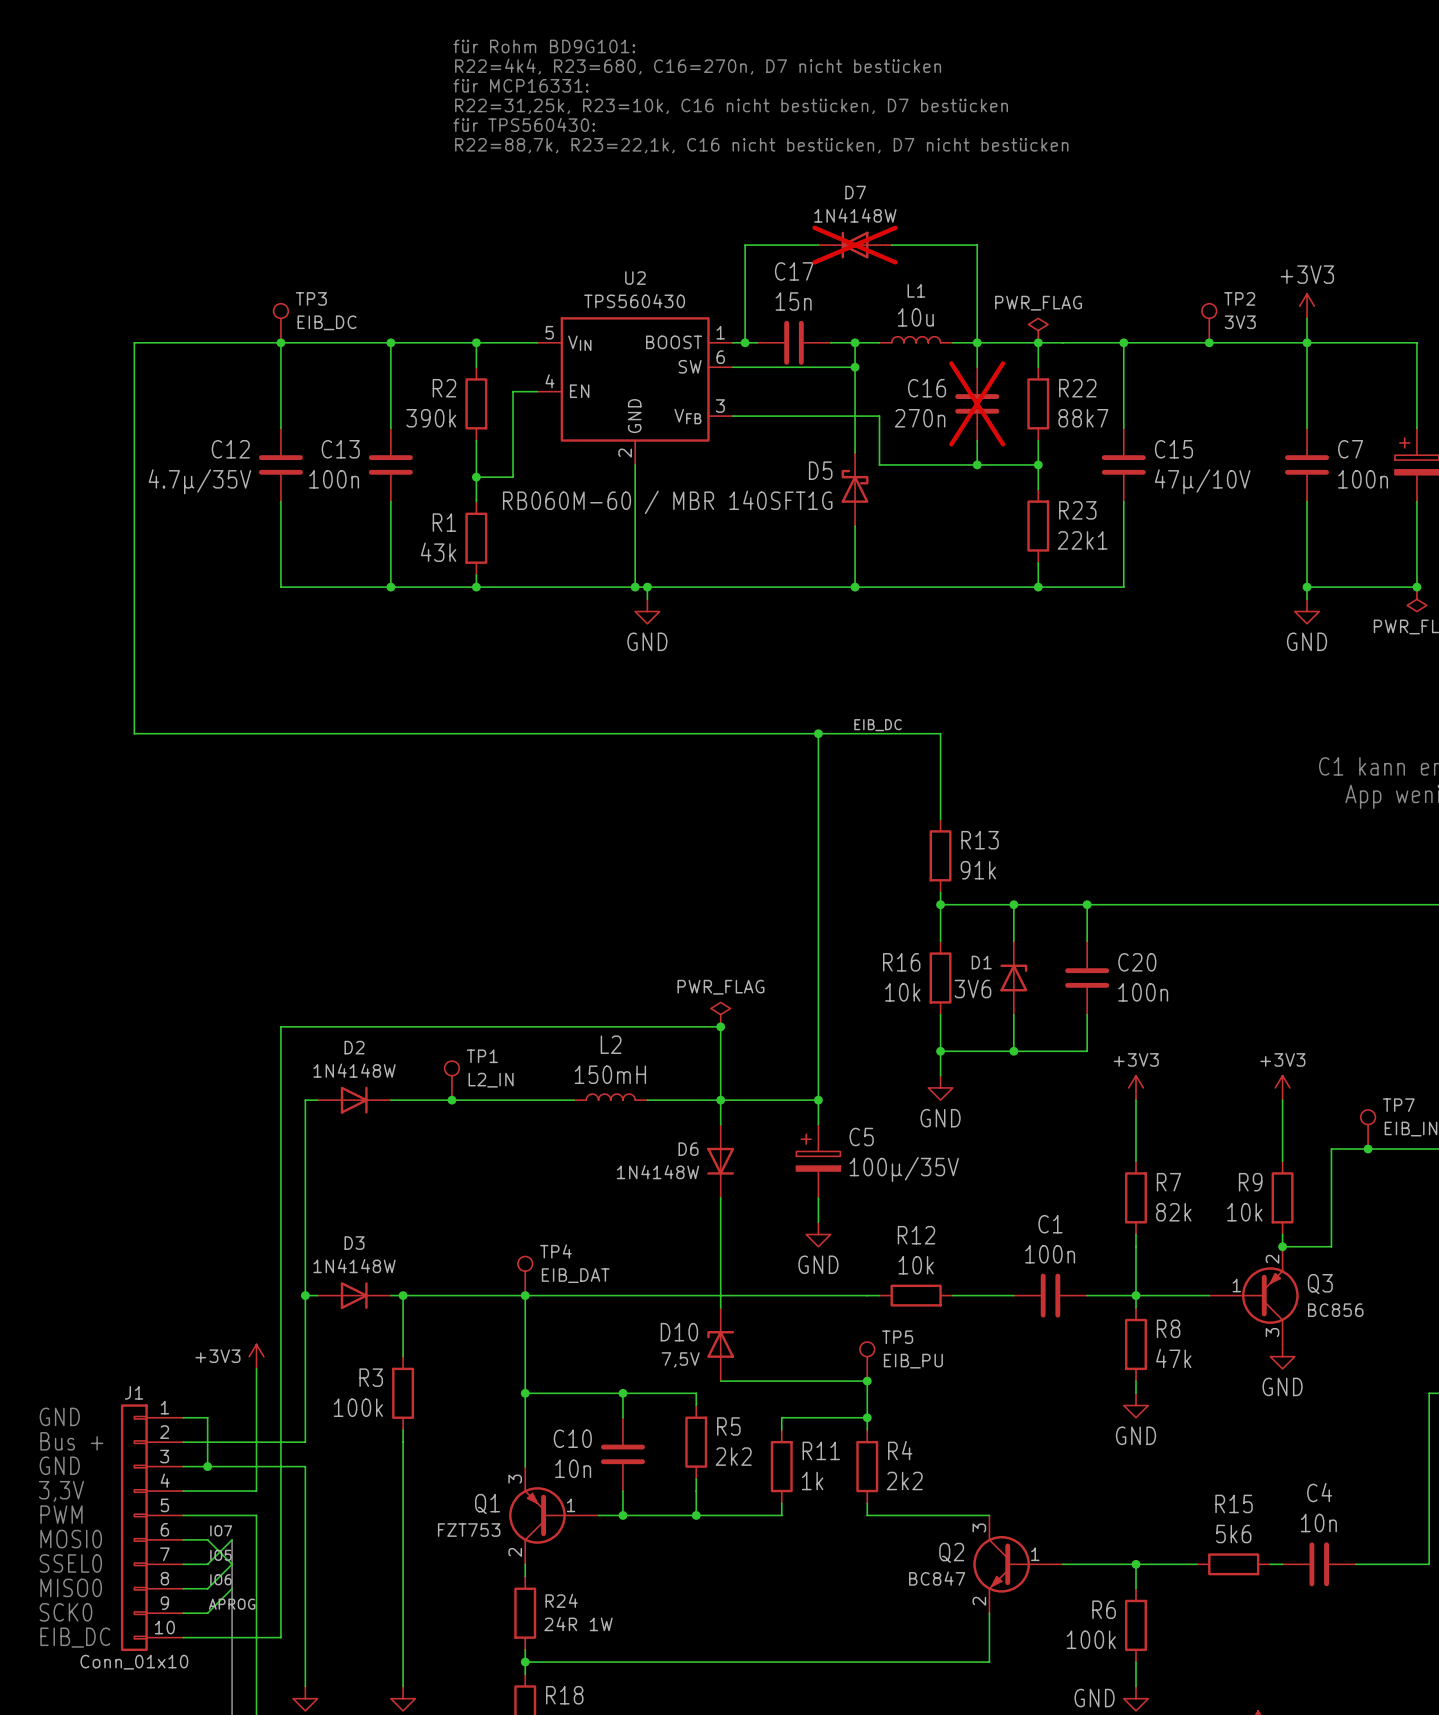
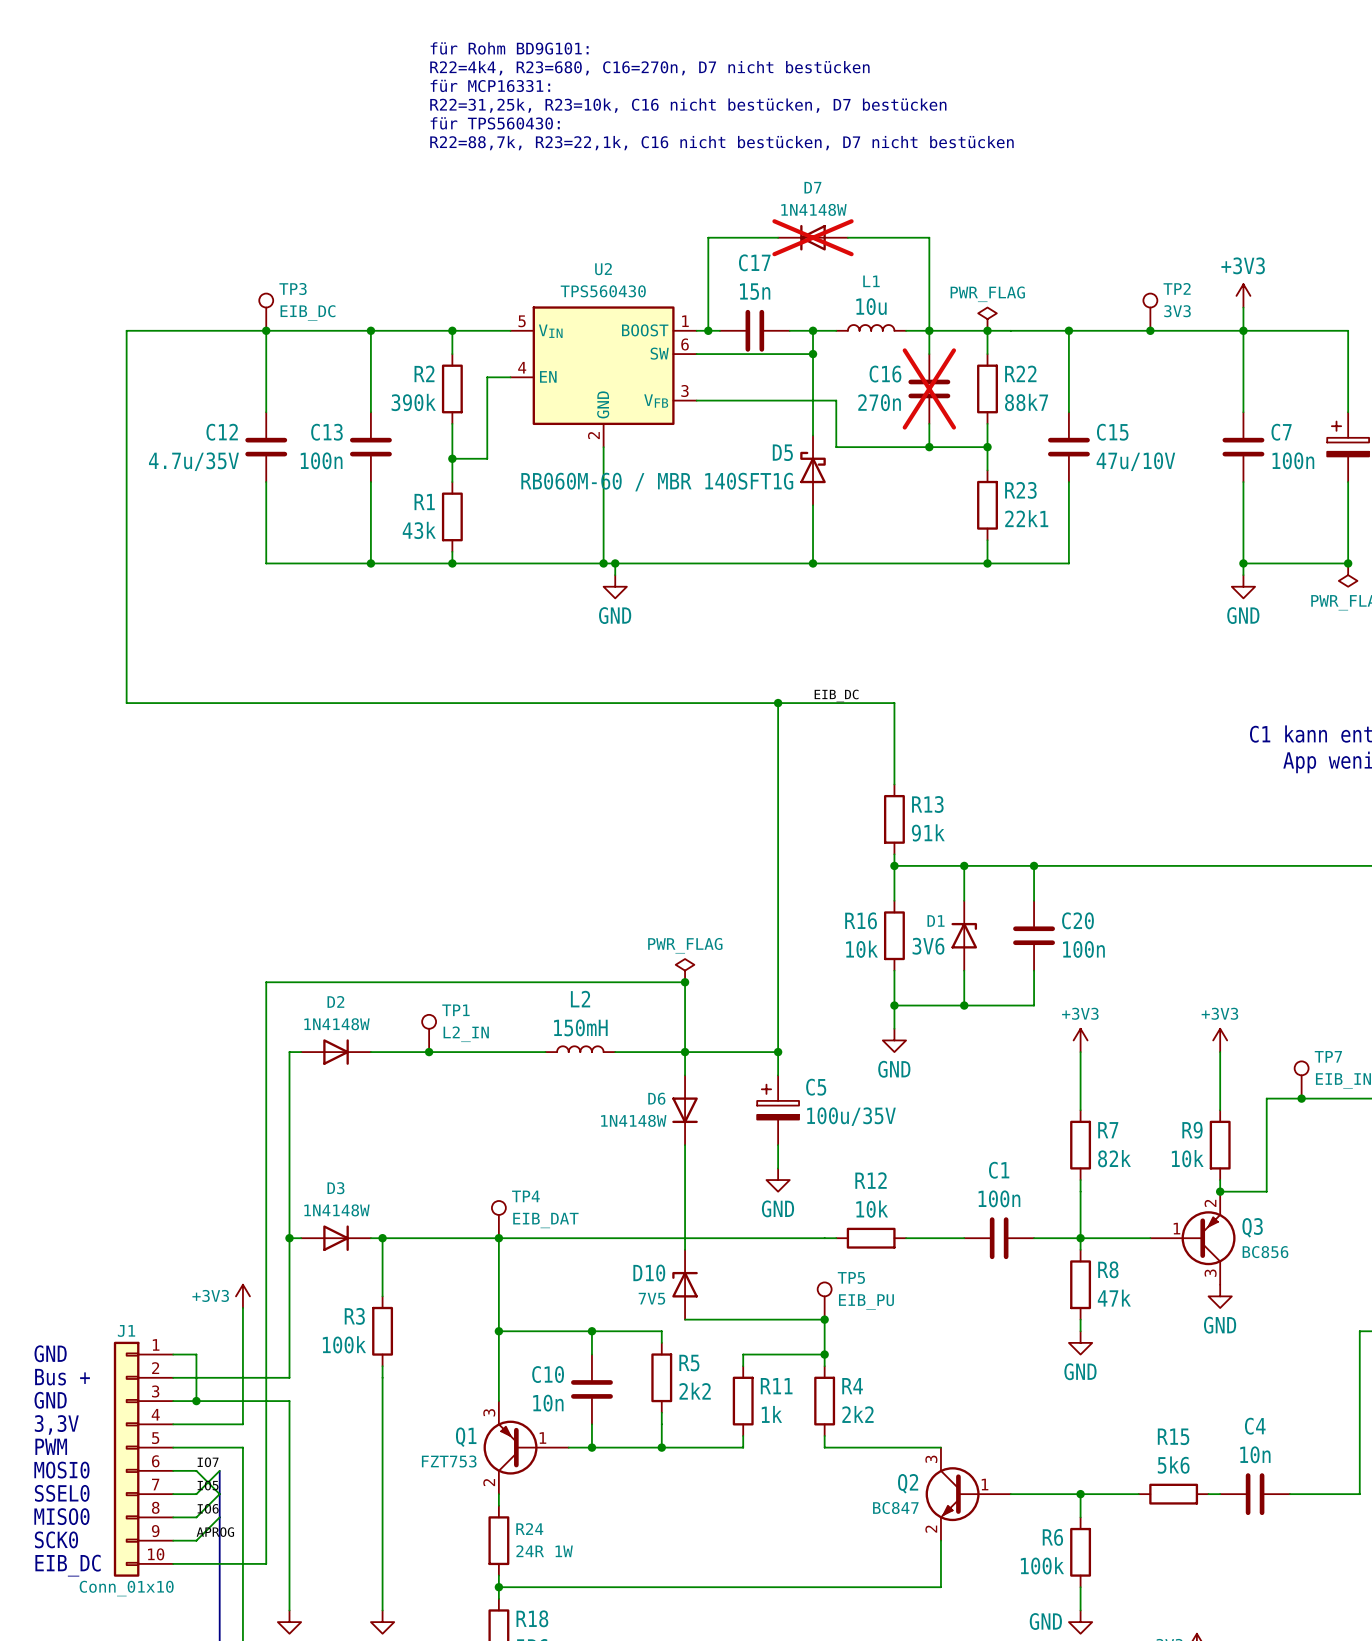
C12 value: 4.7µ/35V (199, 481) -> 4.7u/35V (193, 461)
C15 value: 47µ/10V (1202, 481) -> 47u/10V (1135, 461)
C5 value: 100µ/35V (904, 1169) -> 100u/35V (851, 1116)
D10 value: 7,5V (680, 1359) -> 7V5 (651, 1298)

